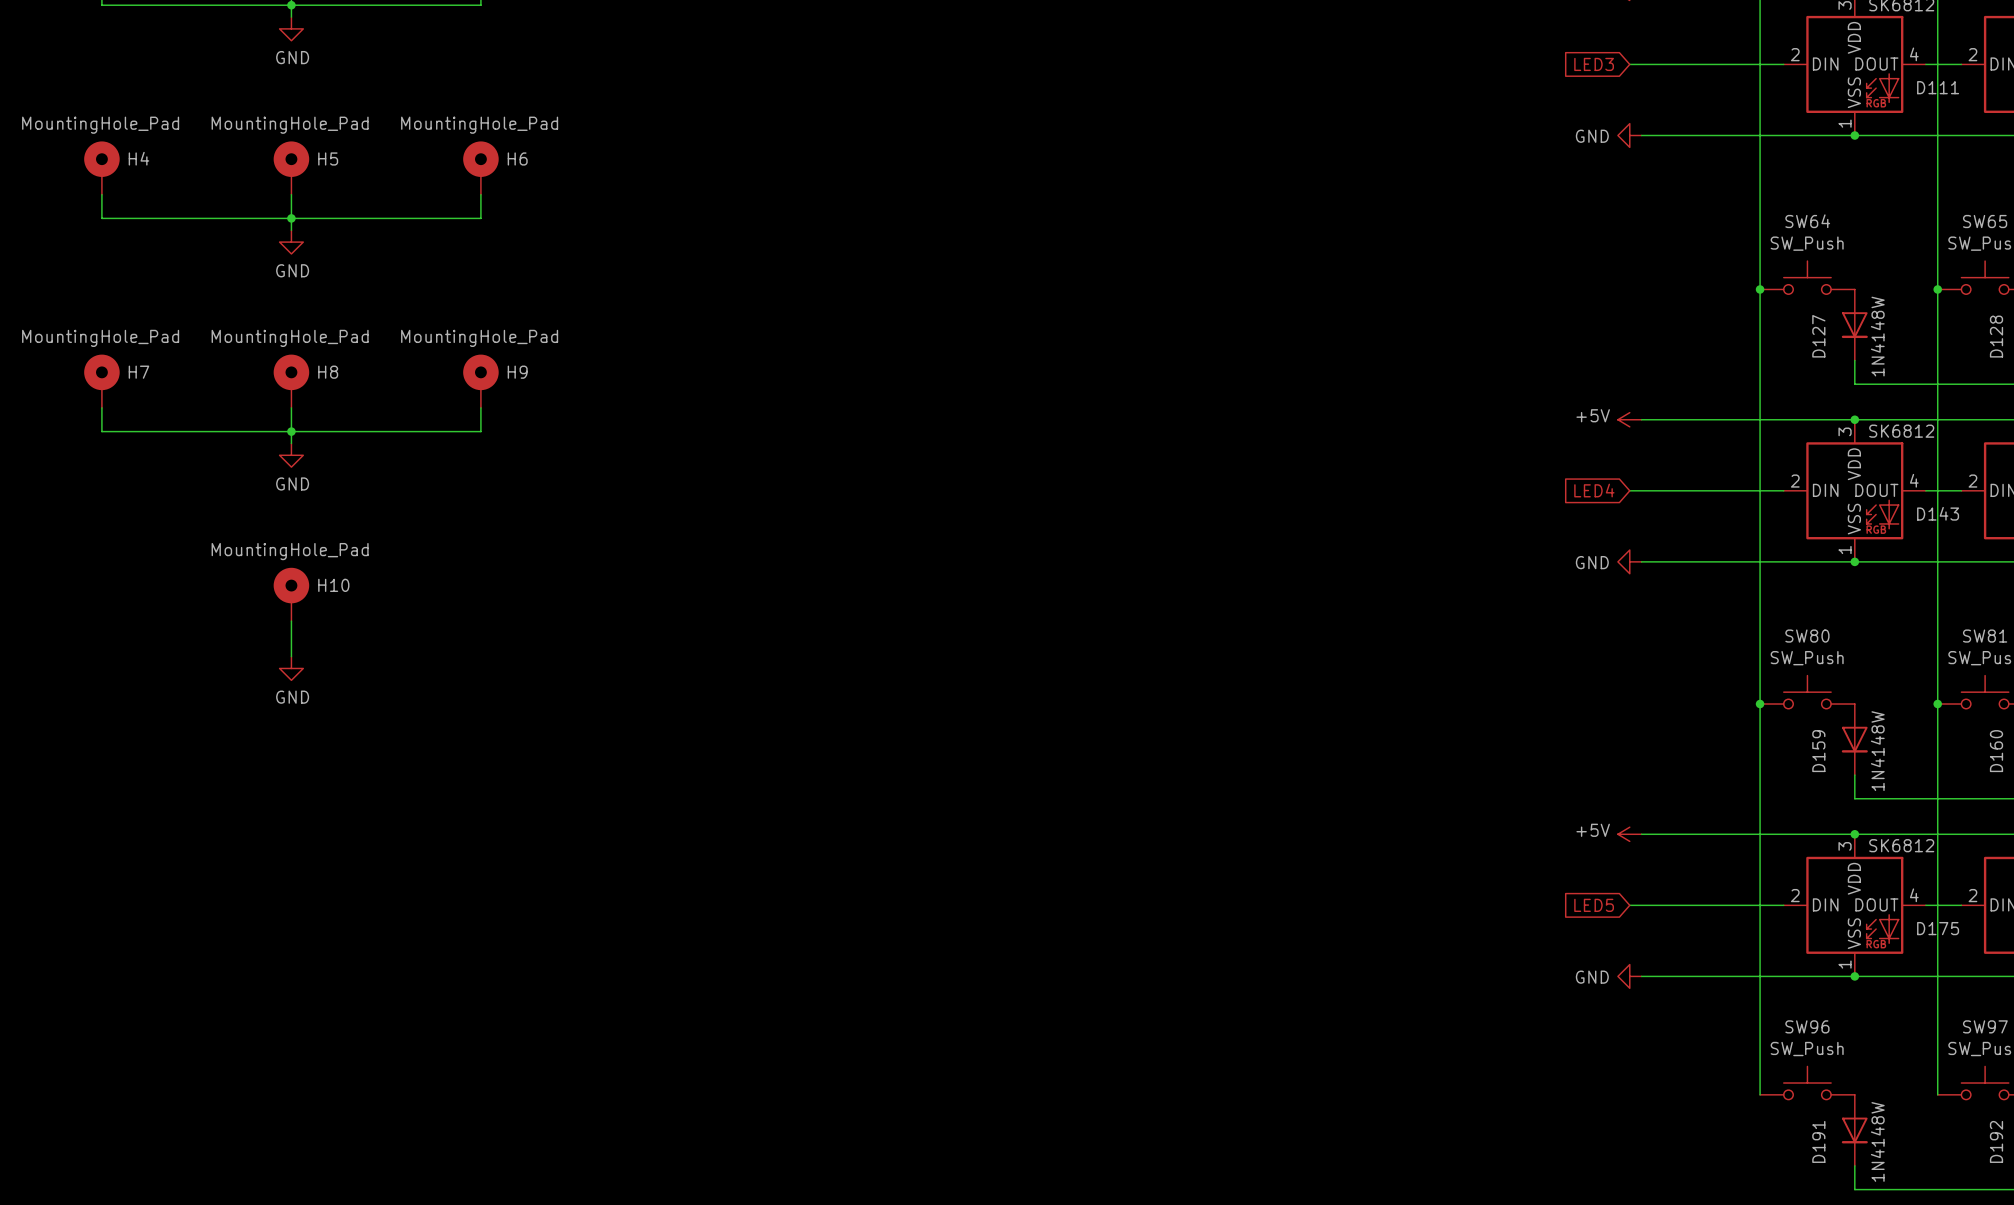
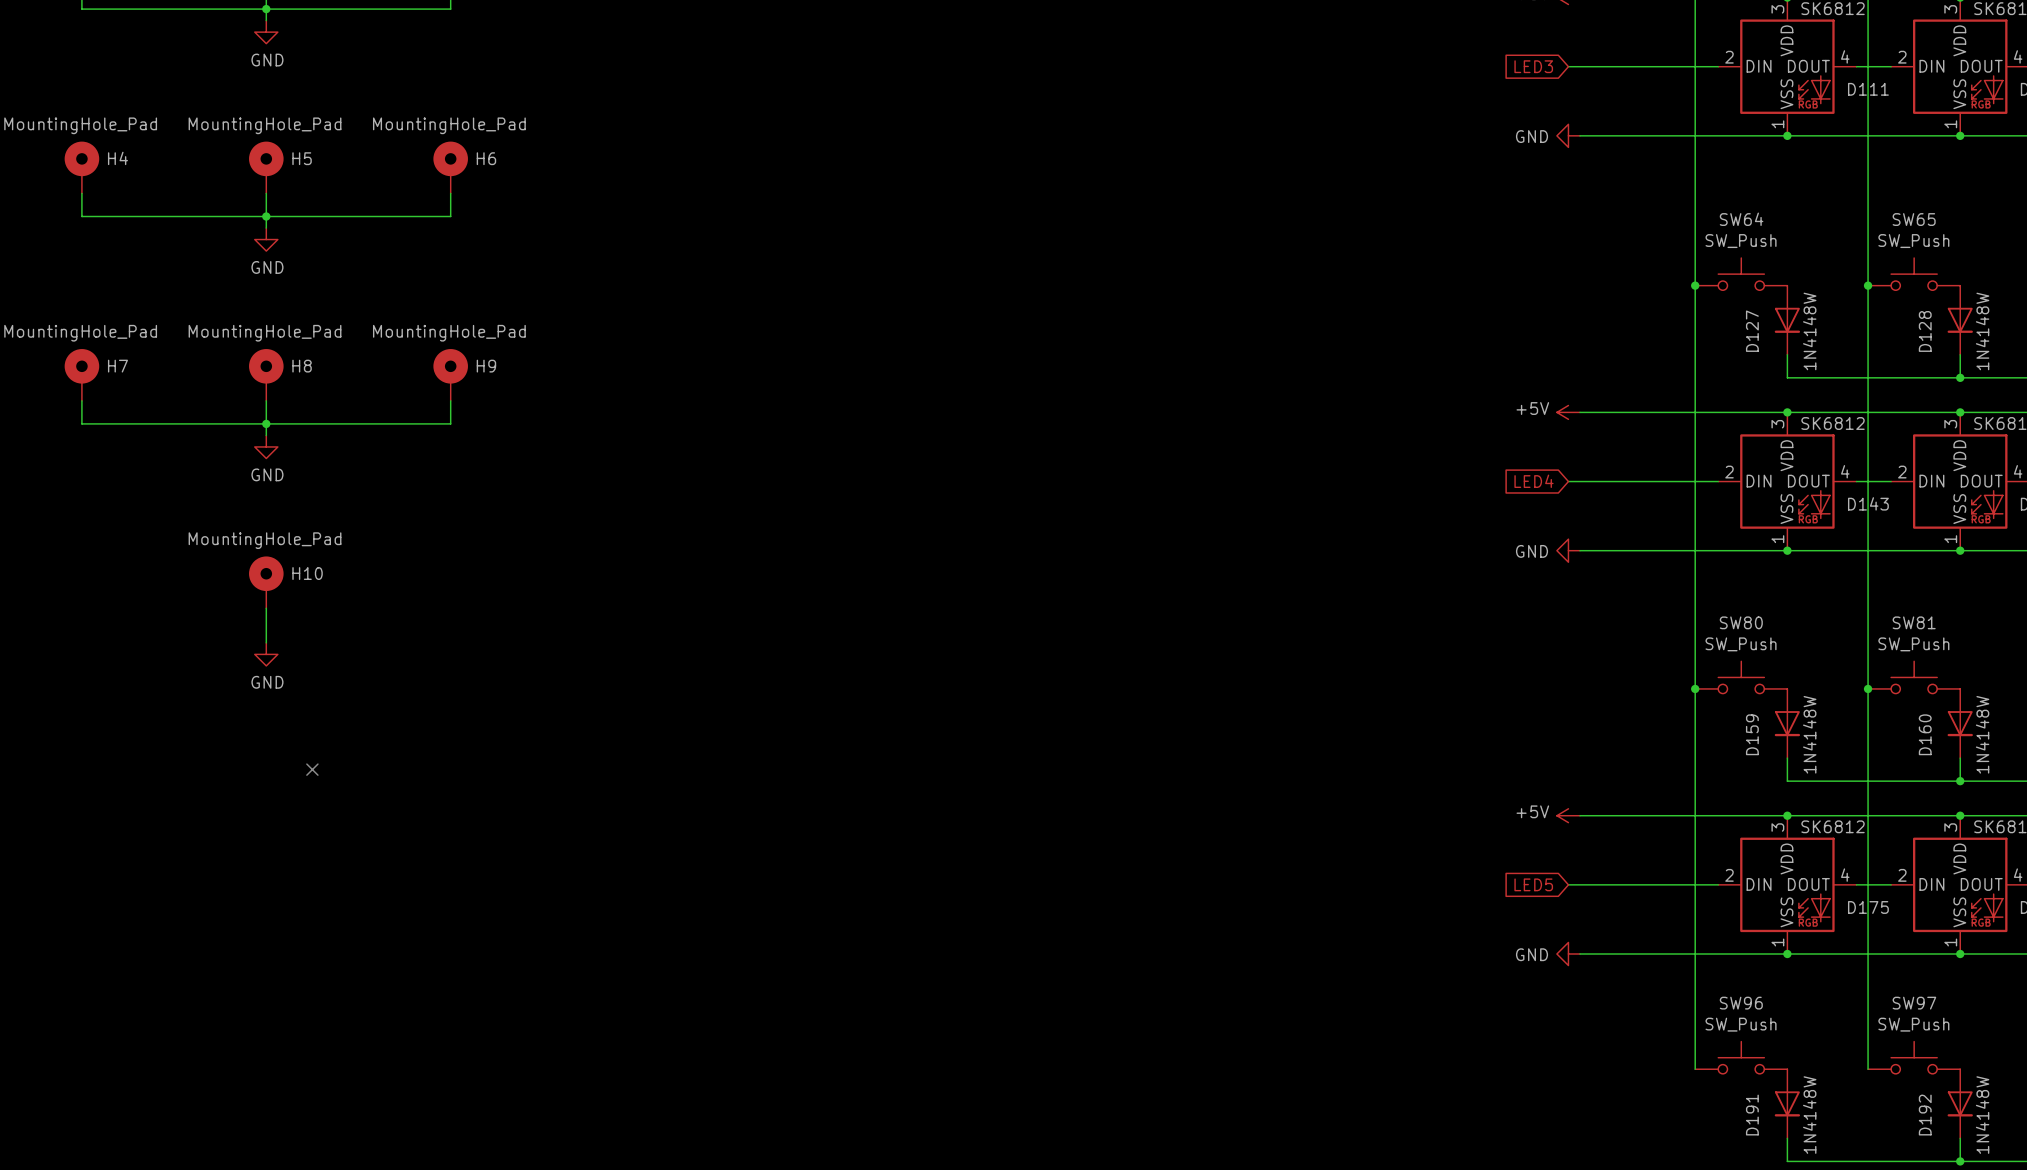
no-connect mark: none -> (312, 769)

